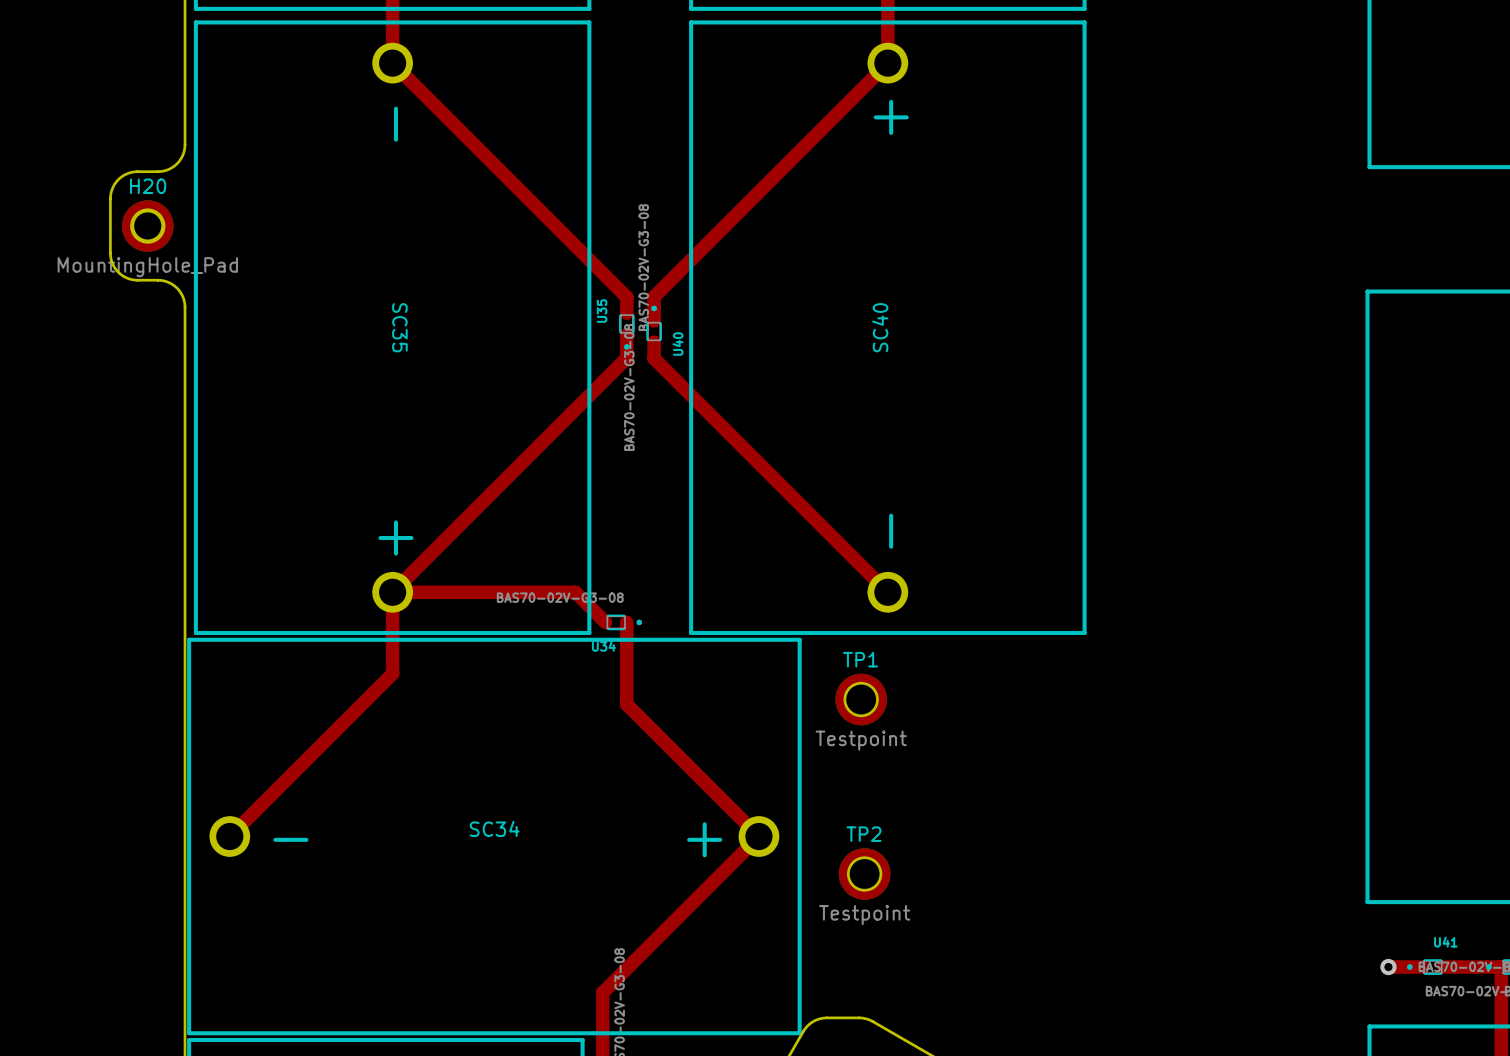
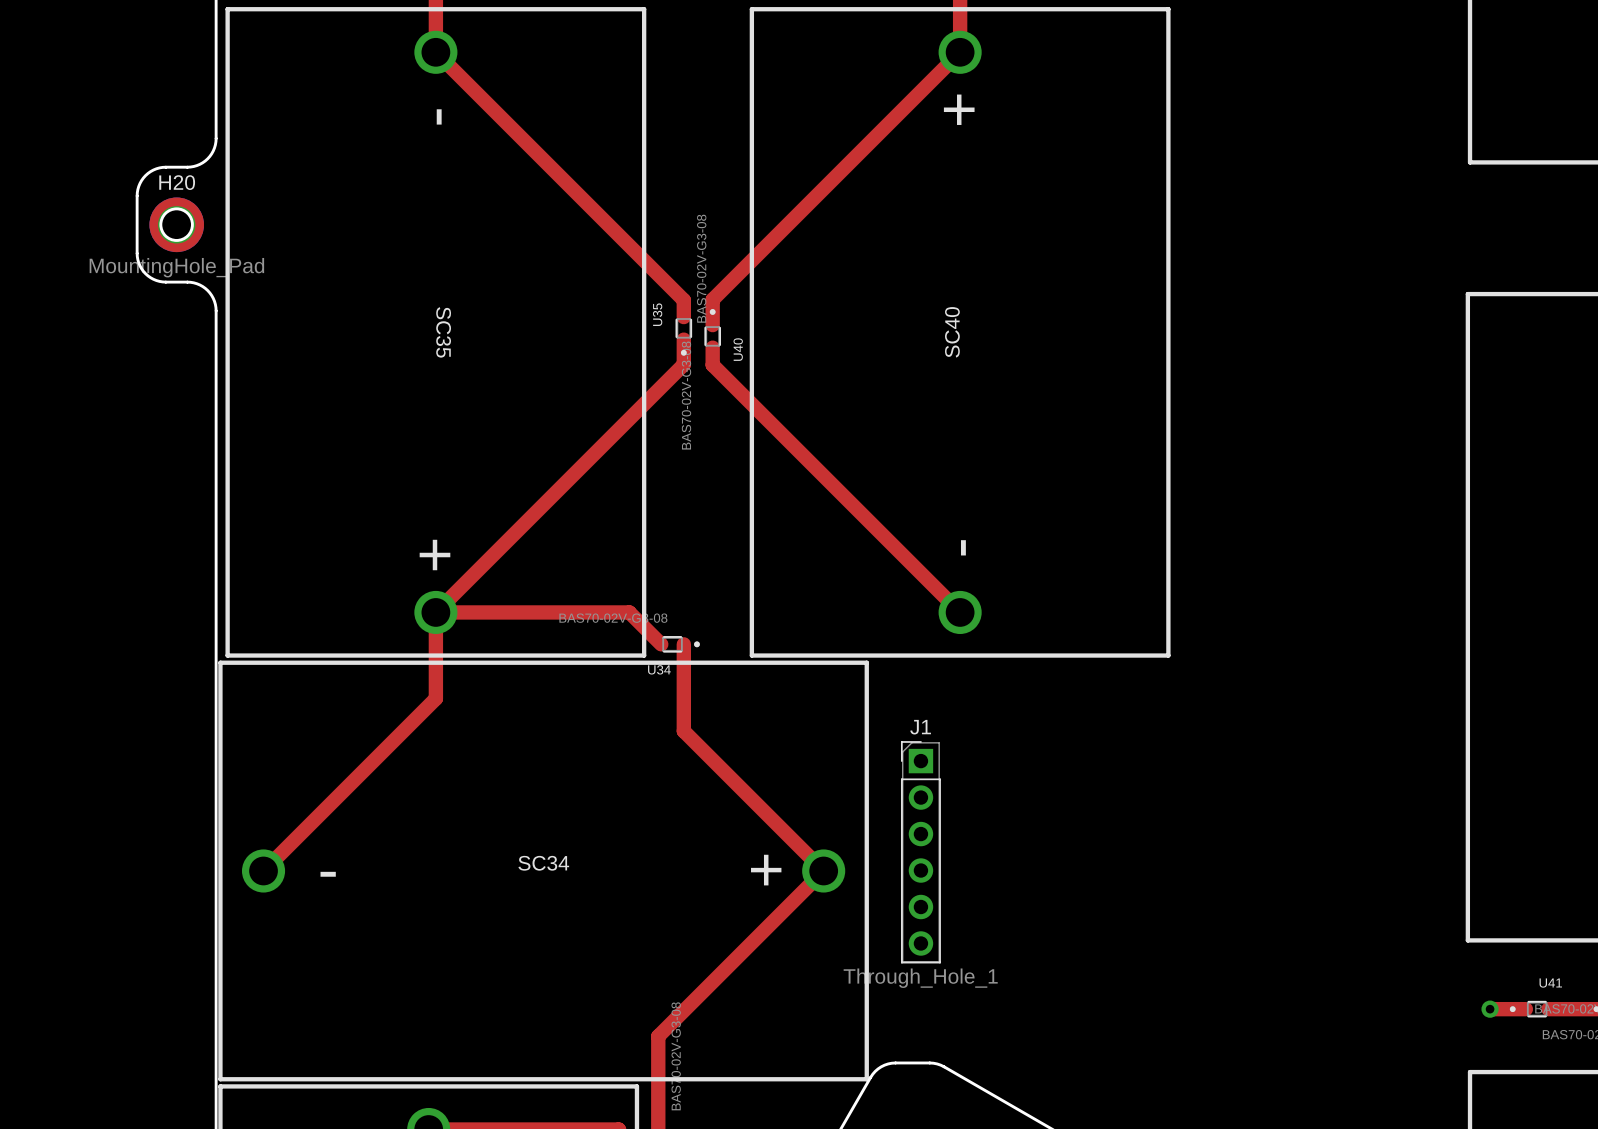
TP1: Testpoint (861, 699) -> none
J1: none -> Through_Hole_1 (920, 852)
TP2: Testpoint (864, 873) -> none

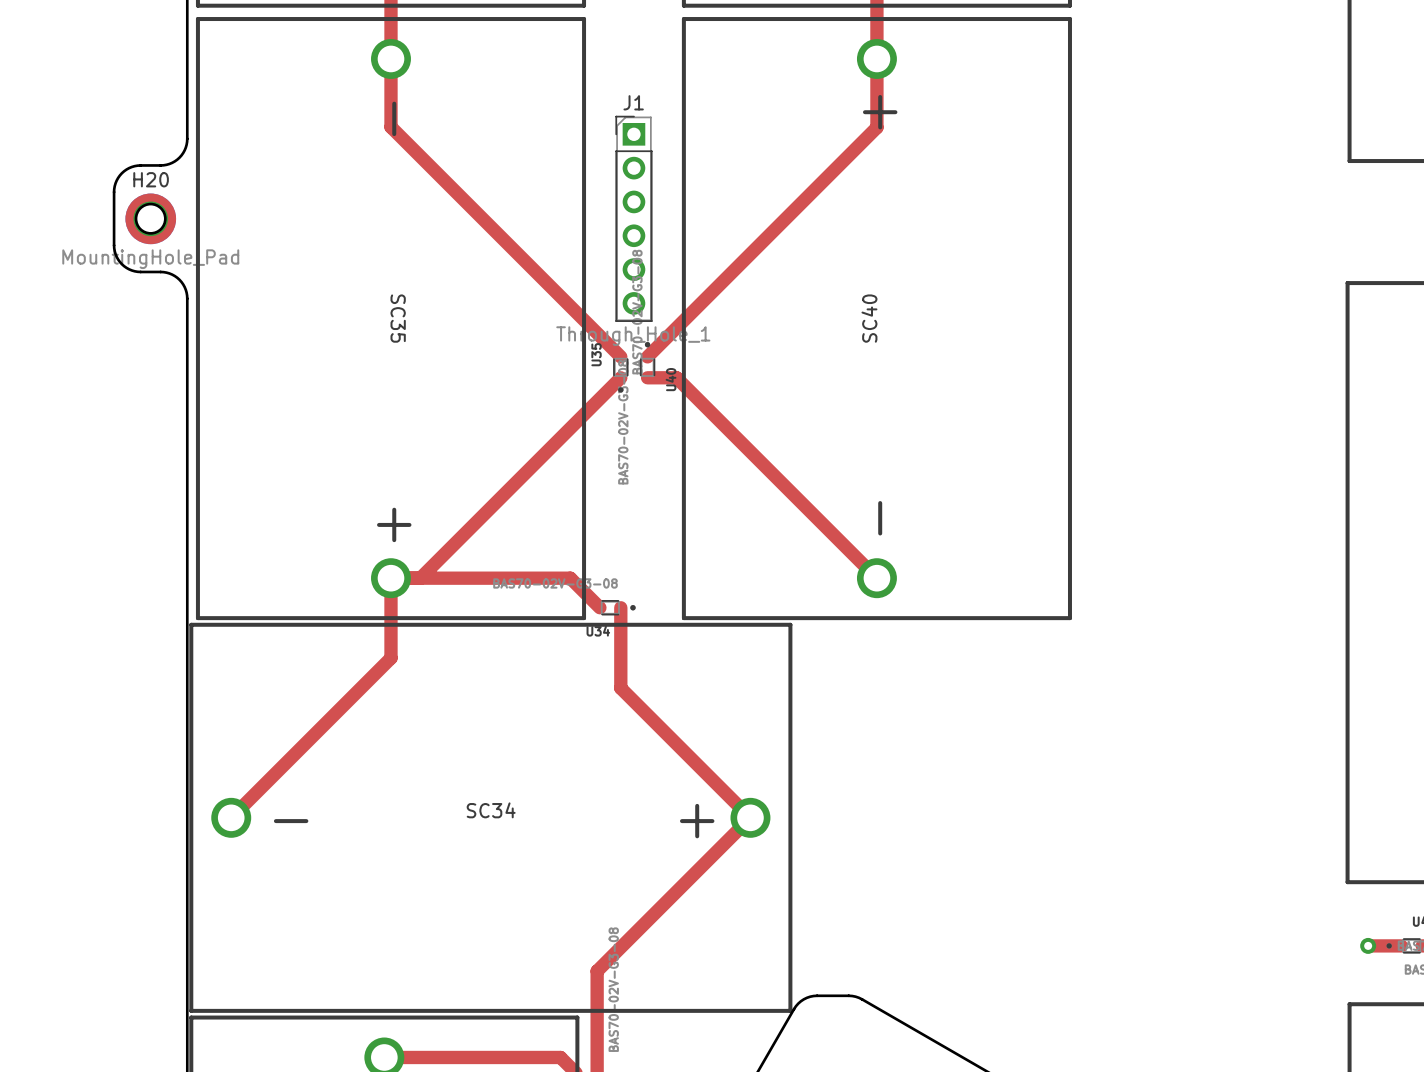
top track: (435, 52) (683, 300) (683, 317) -> (390, 58) (390, 127) (620, 356)
top track: (960, 52) (712, 299) (712, 325) -> (876, 58) (876, 127) (647, 356)
U40 position: (712, 330) -> (647, 361)
U35 position: (683, 334) -> (620, 372)
top track: (683, 339) (683, 364) (435, 612) -> none
top track: (712, 347) (712, 365) (743, 396) -> (647, 377) (676, 377)
top track: none -> (620, 377) (420, 578)
J1 position: (920, 852) -> (633, 218)

